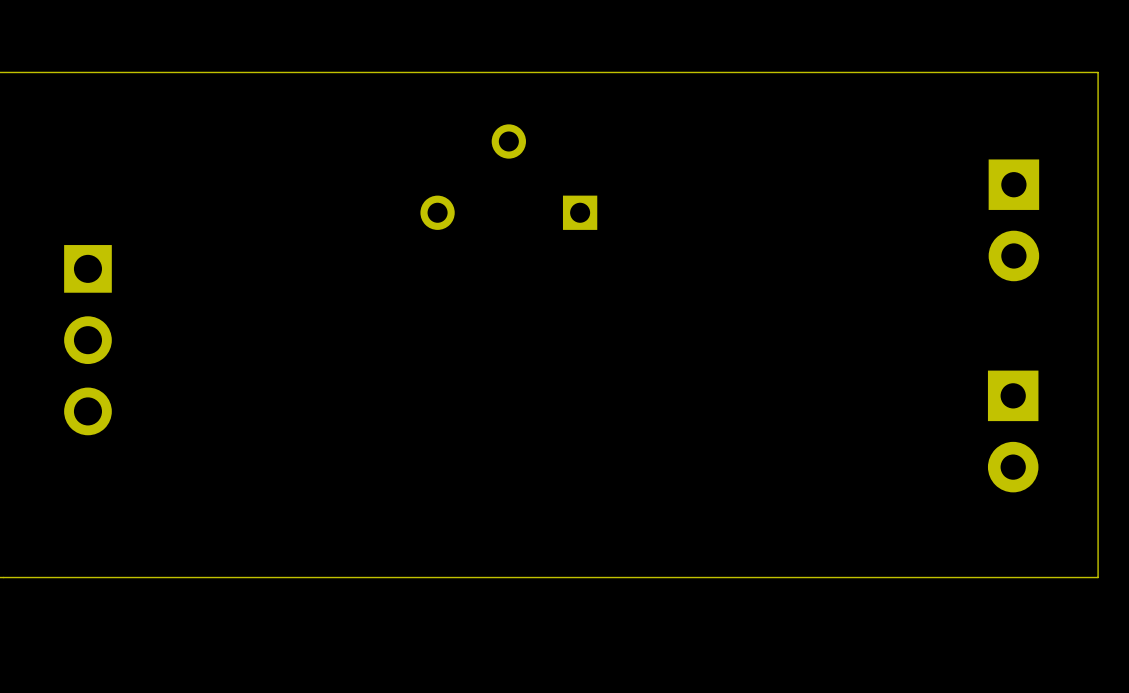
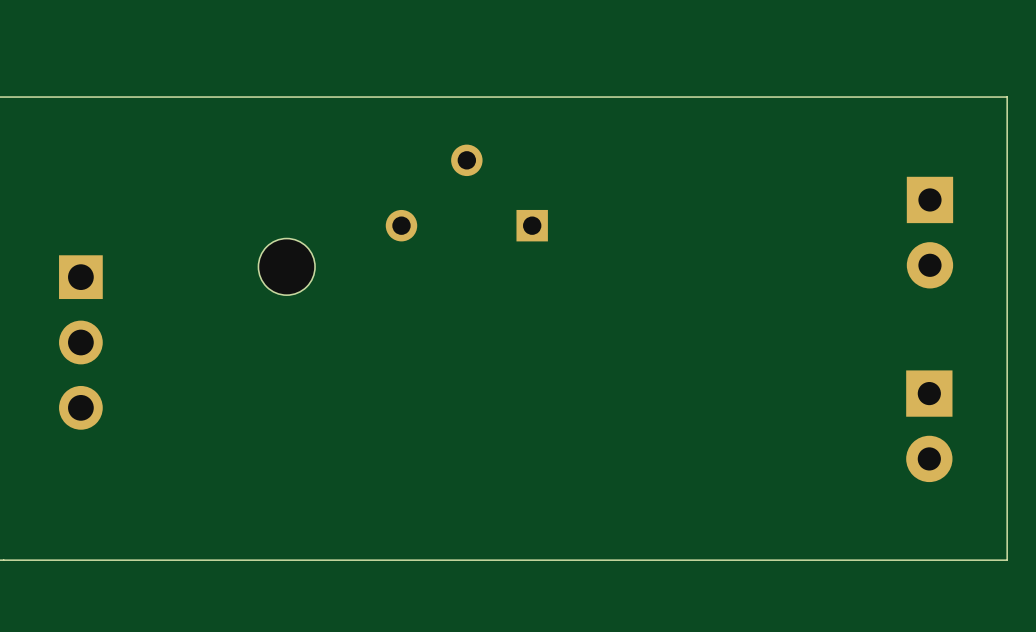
part: none -> (286, 266)

